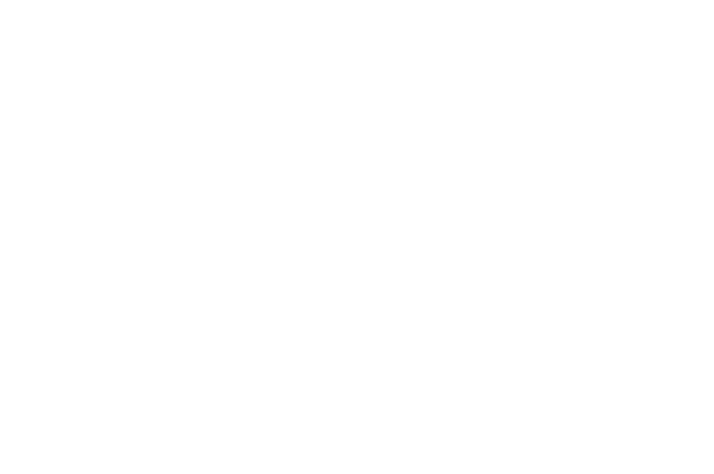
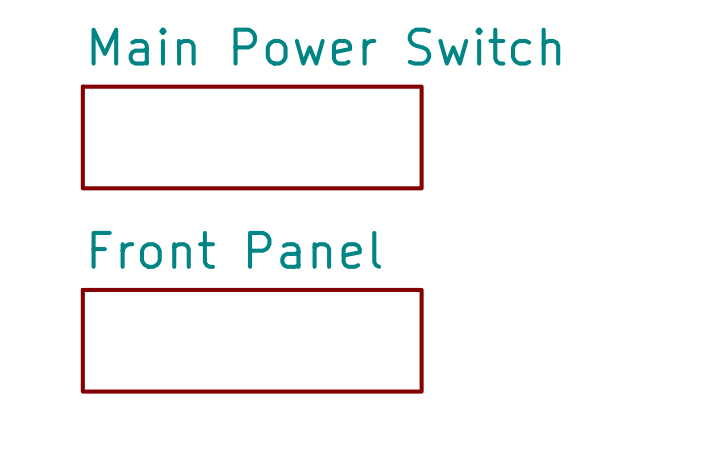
sheet Main Power Switch: none -> (252, 137)
sheet Front Panel: none -> (252, 340)

